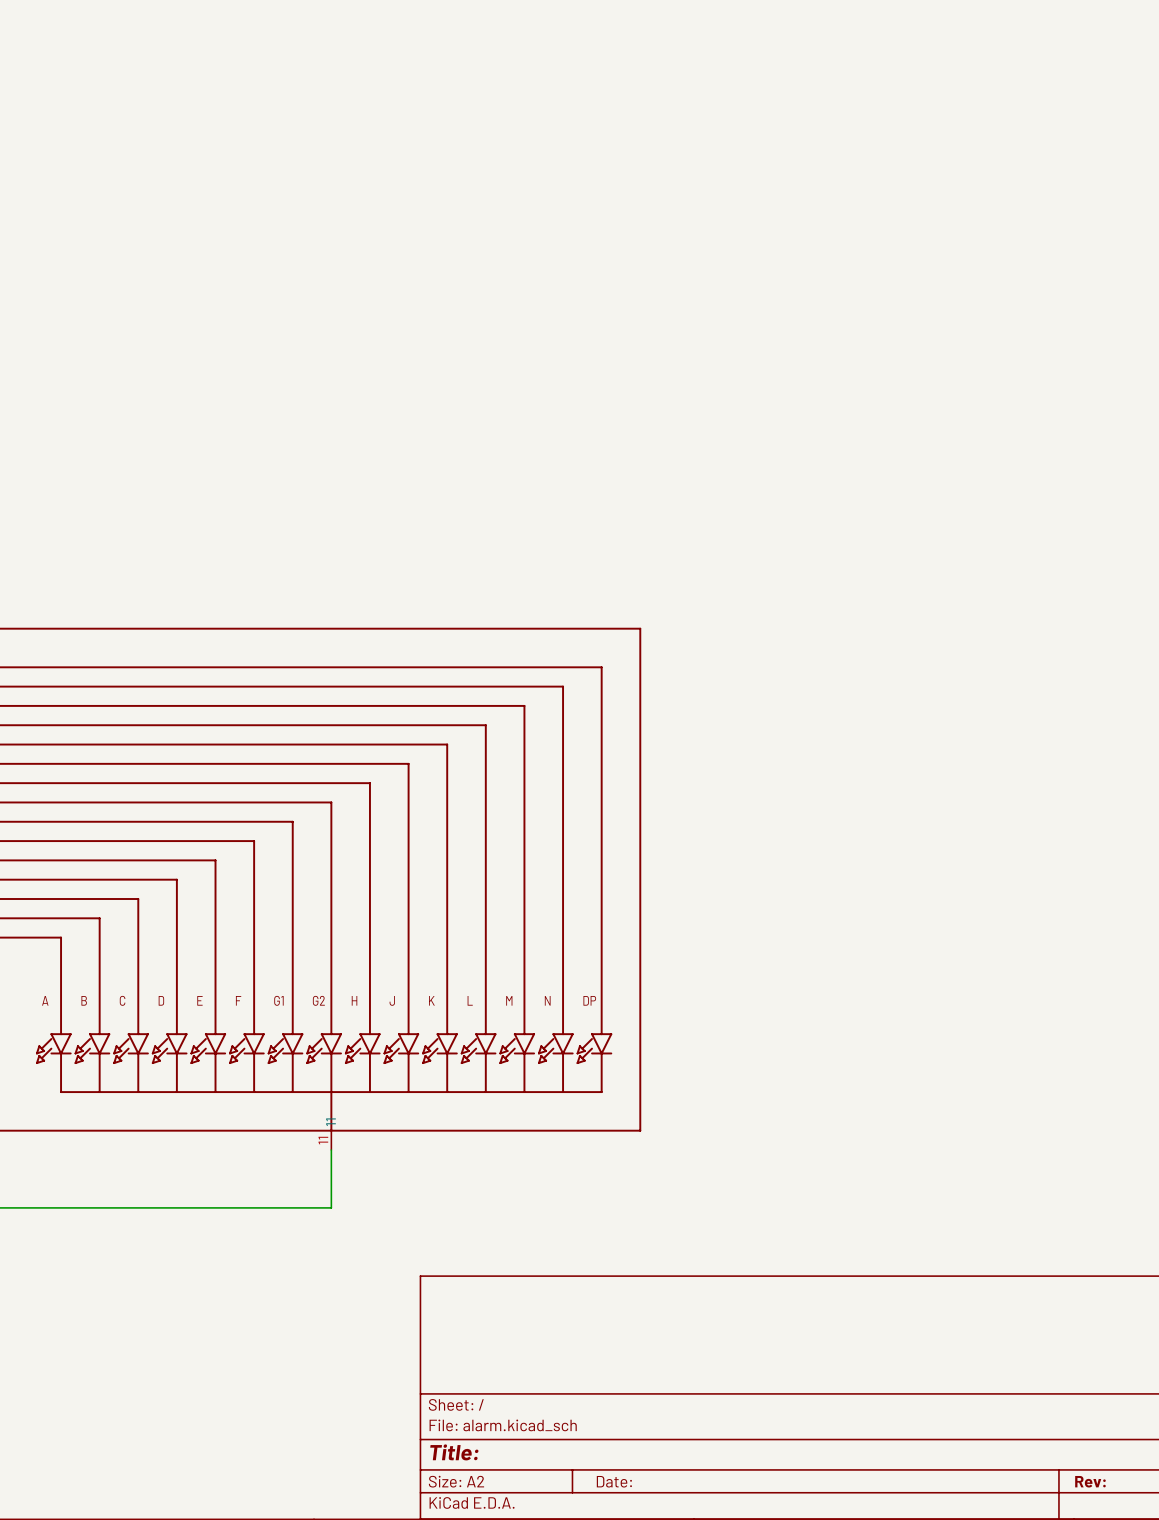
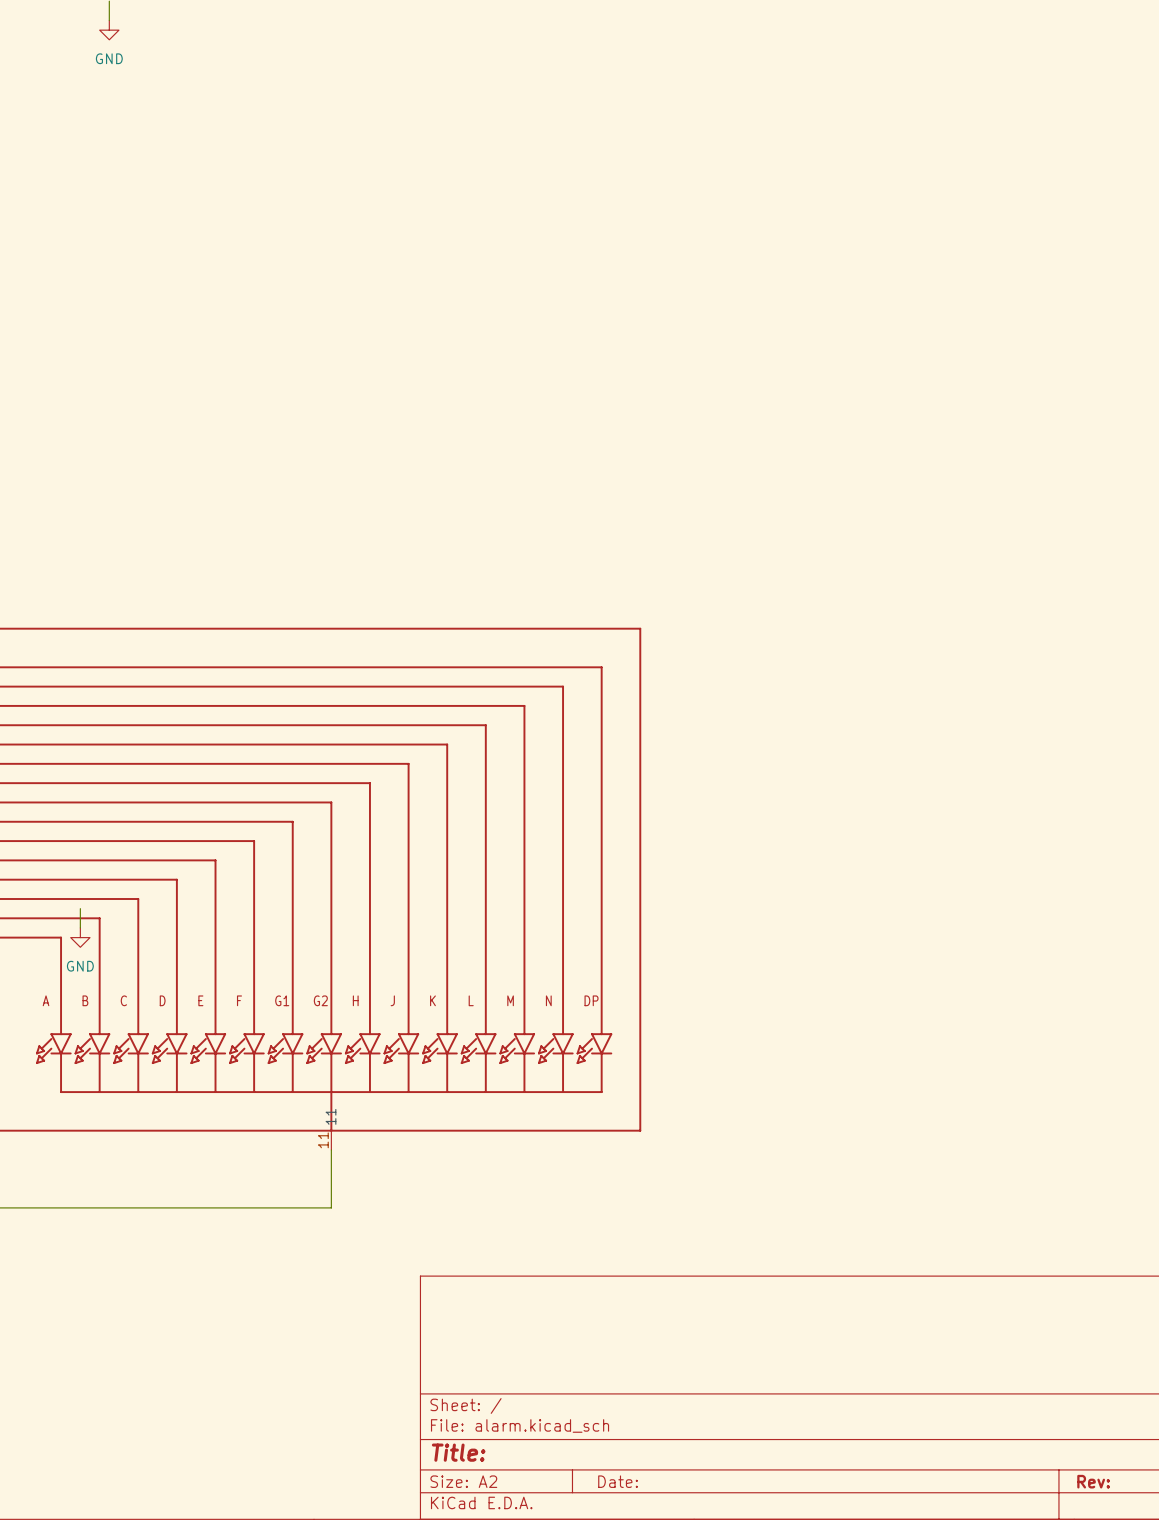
wire: none -> (109, 1) (109, 20)
power symbol: none -> GND (109, 30)
wire: none -> (80, 908) (80, 927)
power symbol: none -> GND (80, 937)

